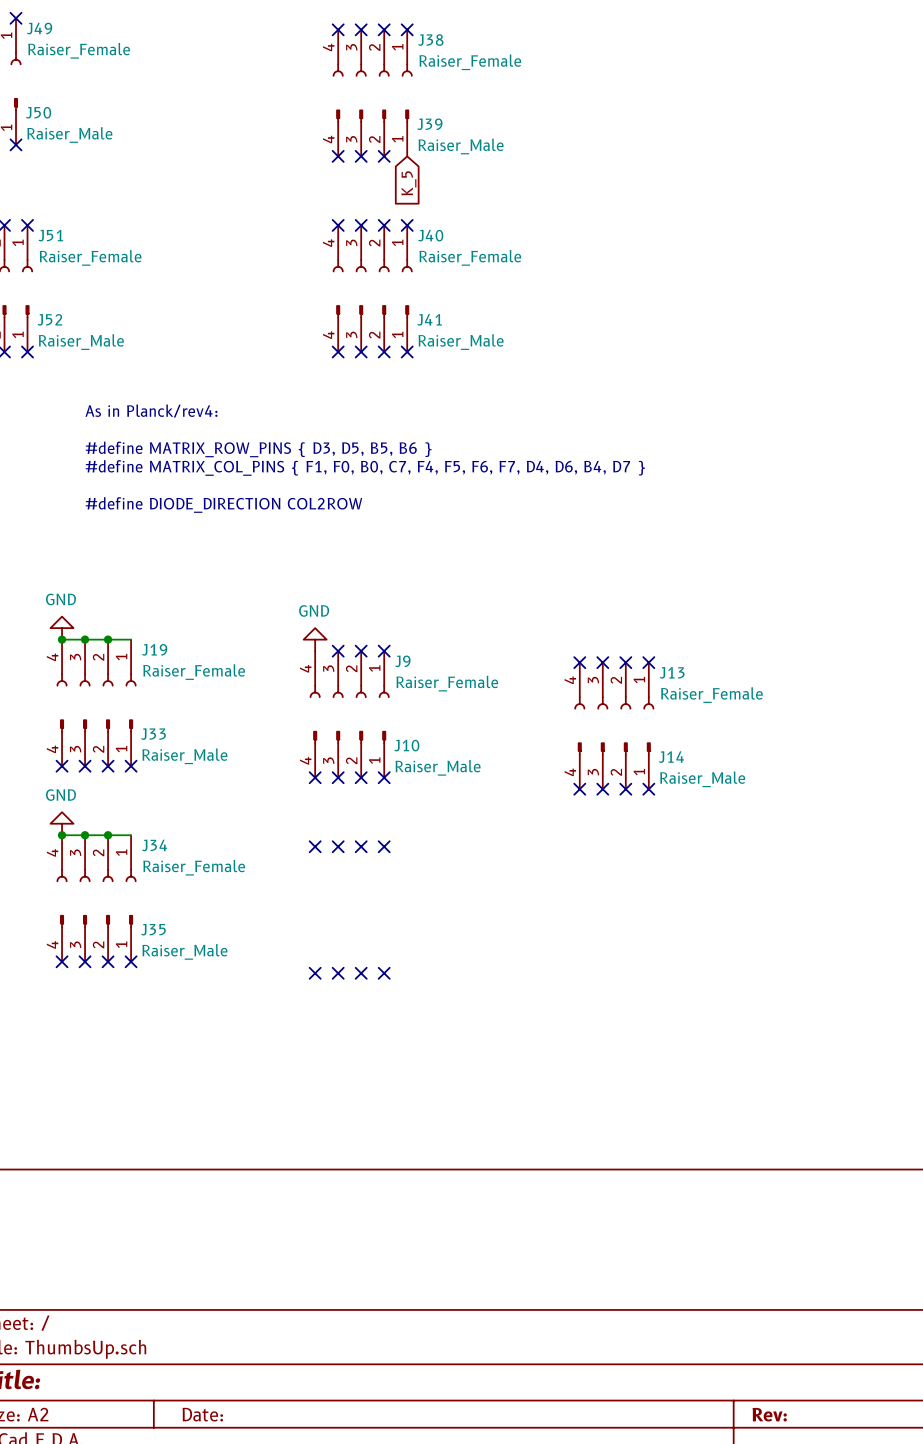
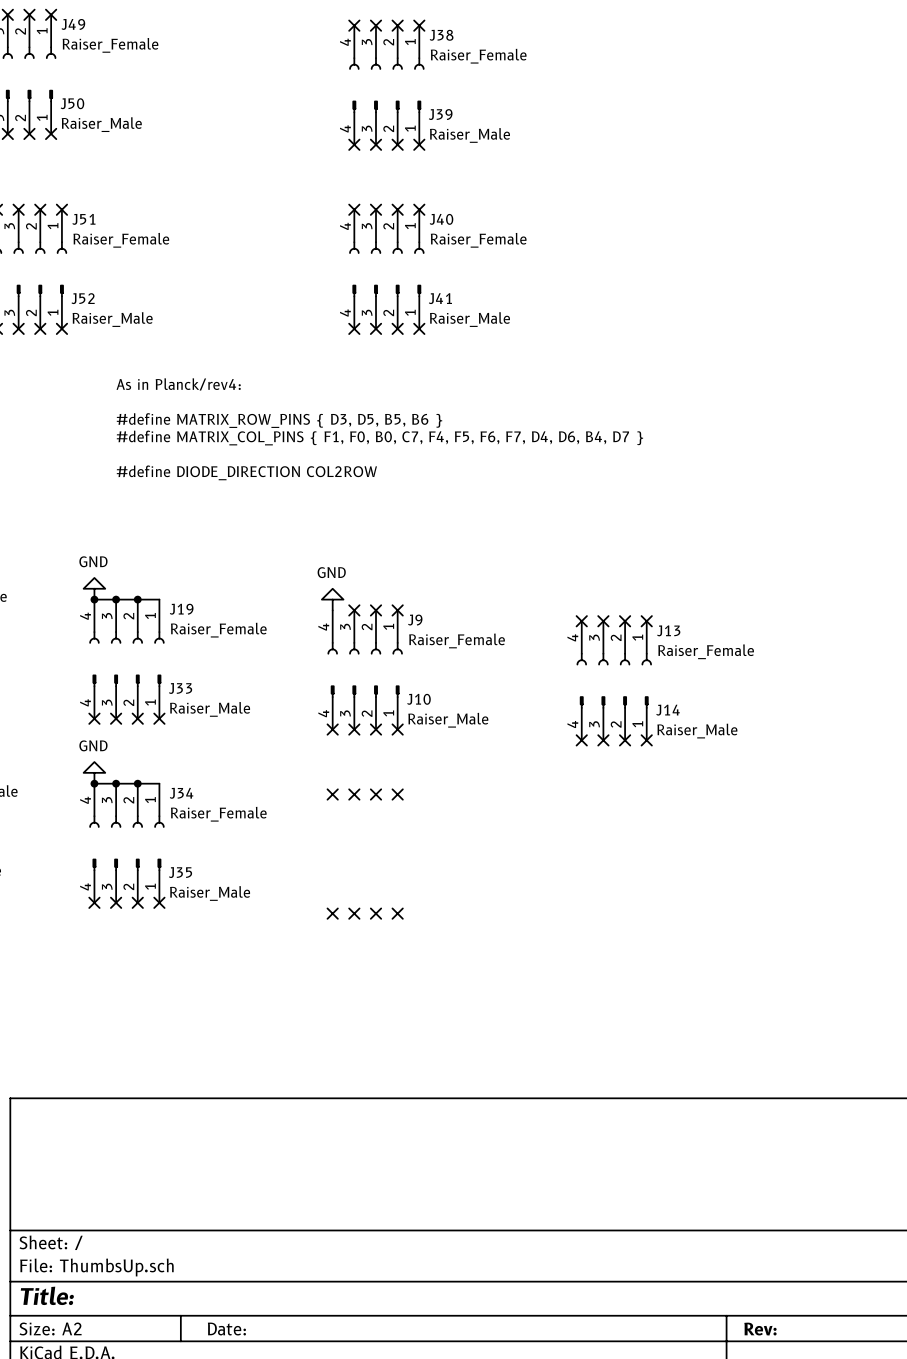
no-connect mark: none -> (419, 144)
global label: K_5 (408, 183) -> none

